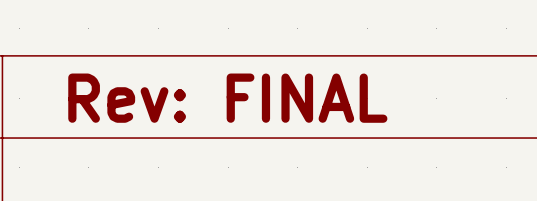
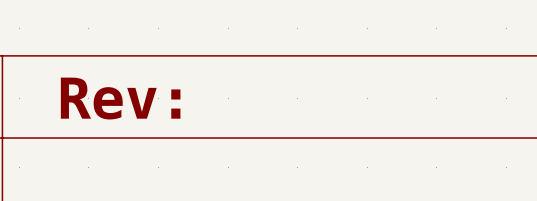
title block: Rev: FINAL (227, 98) -> Rev: (120, 98)

